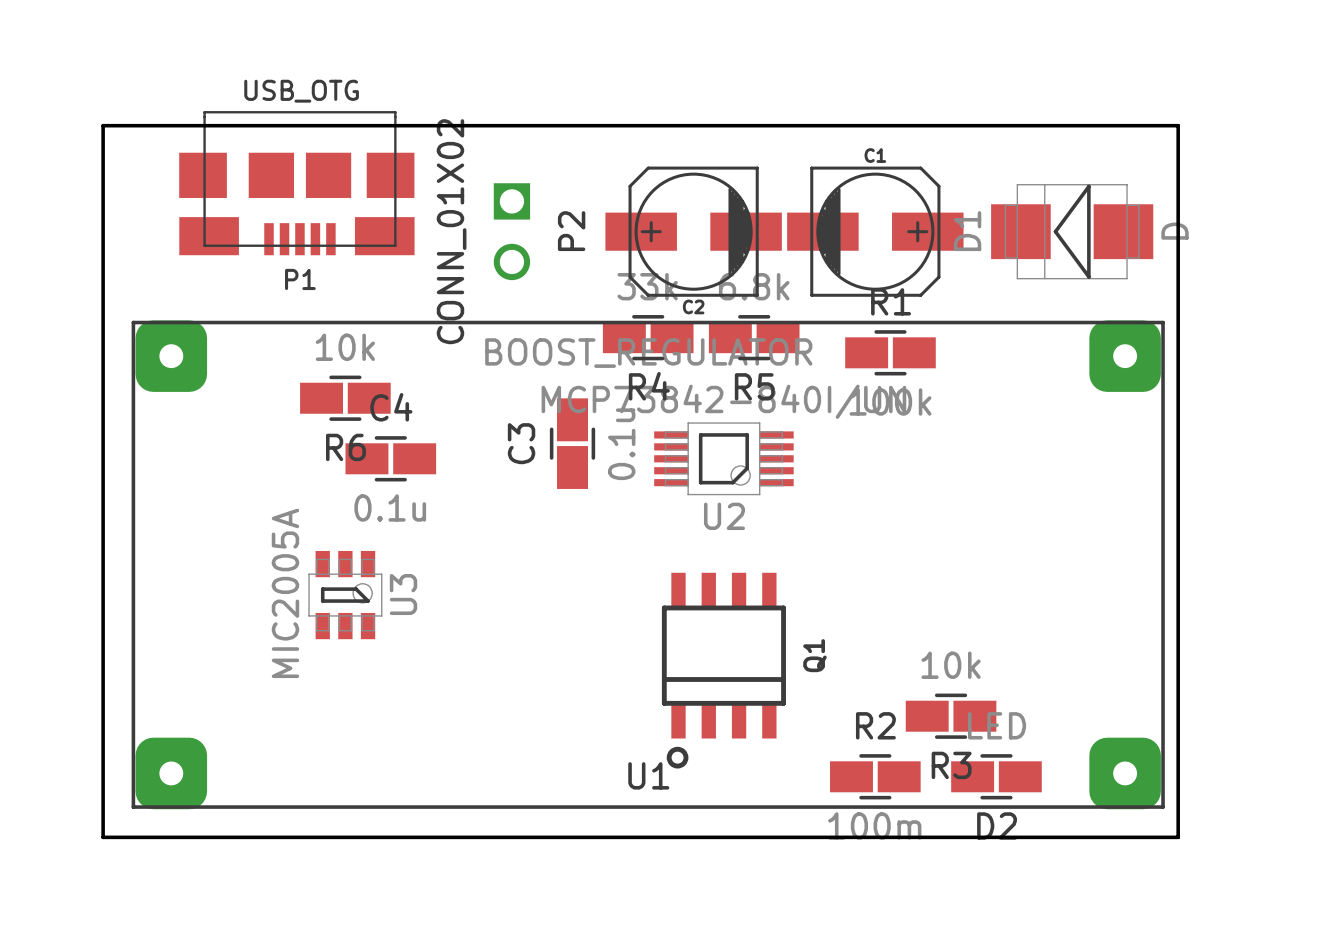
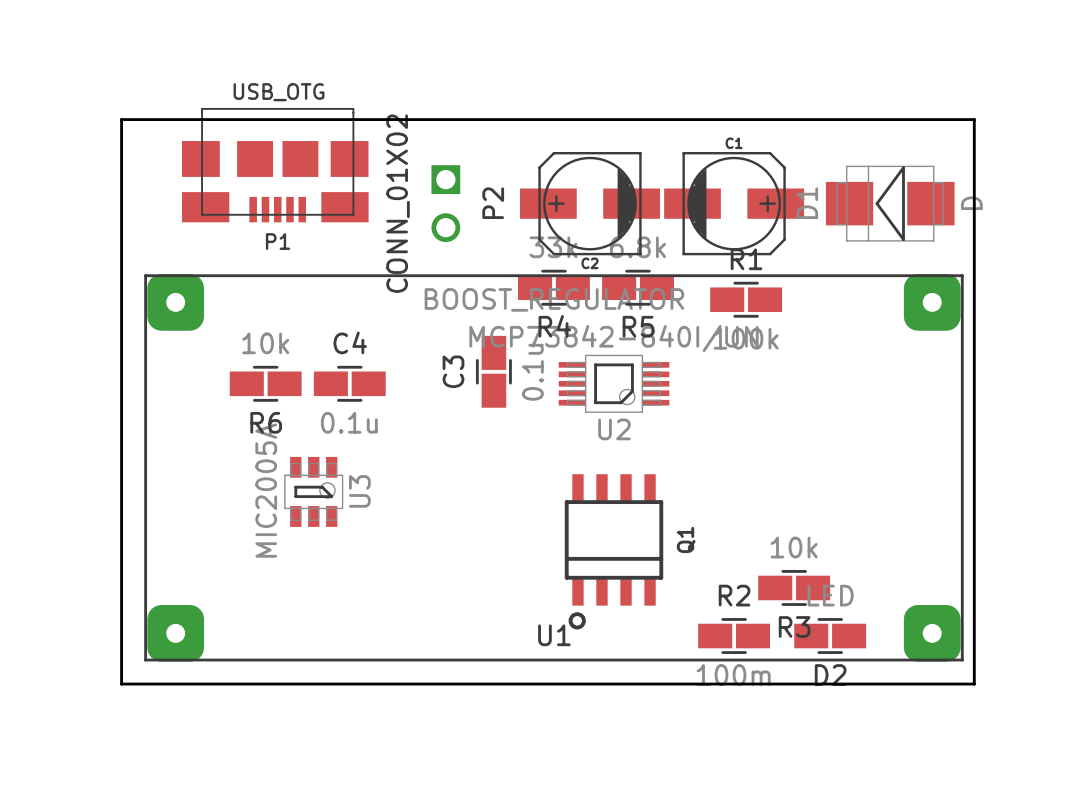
R6 position: (345, 398) -> (265, 383)

